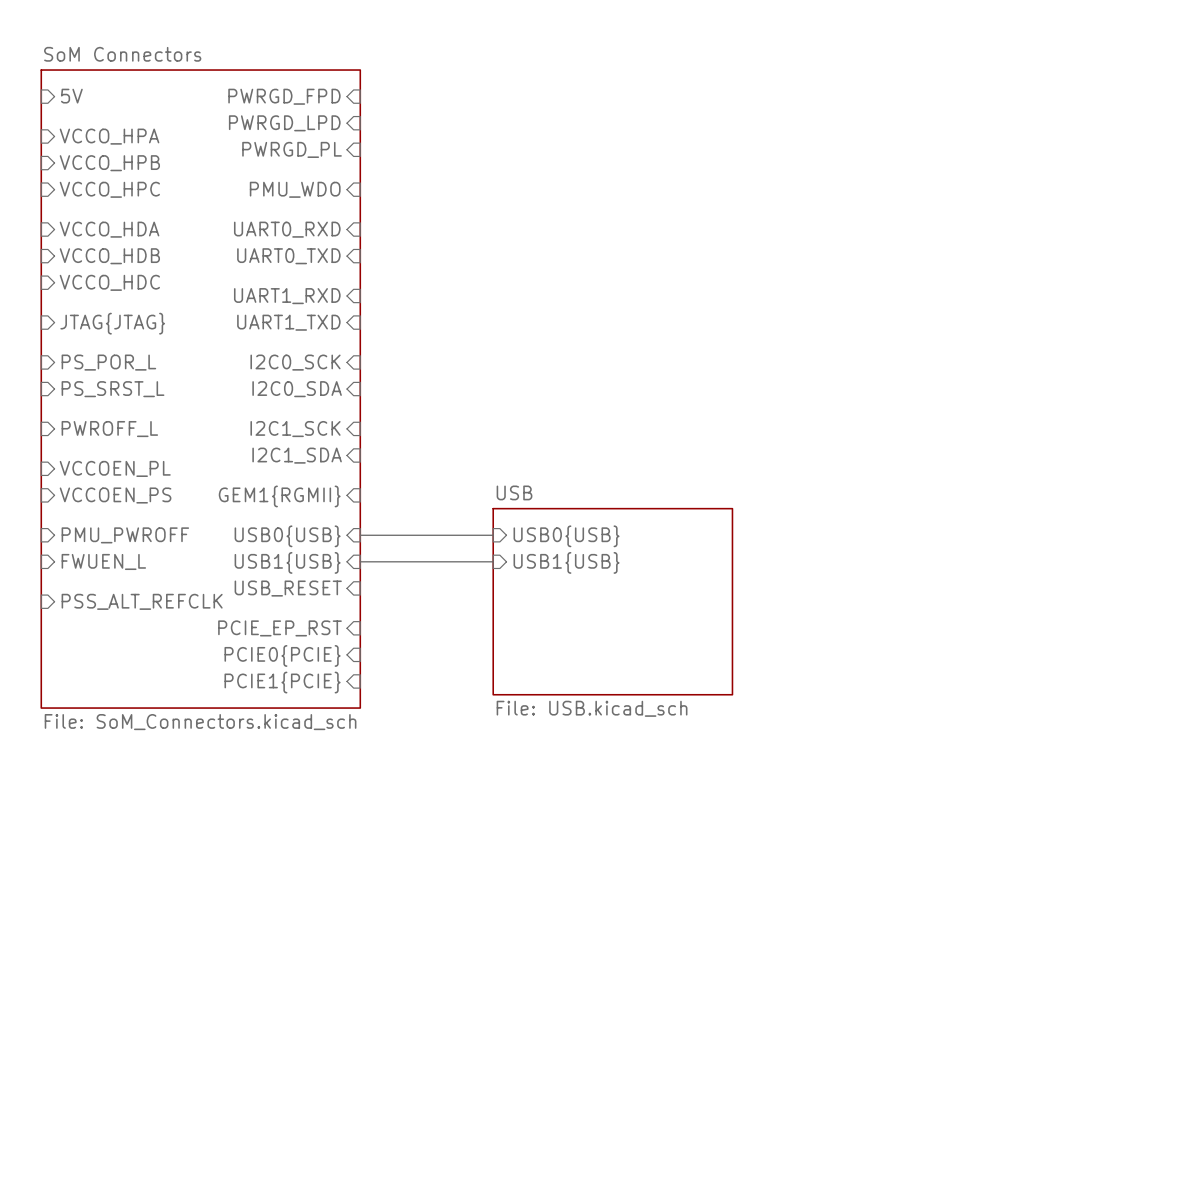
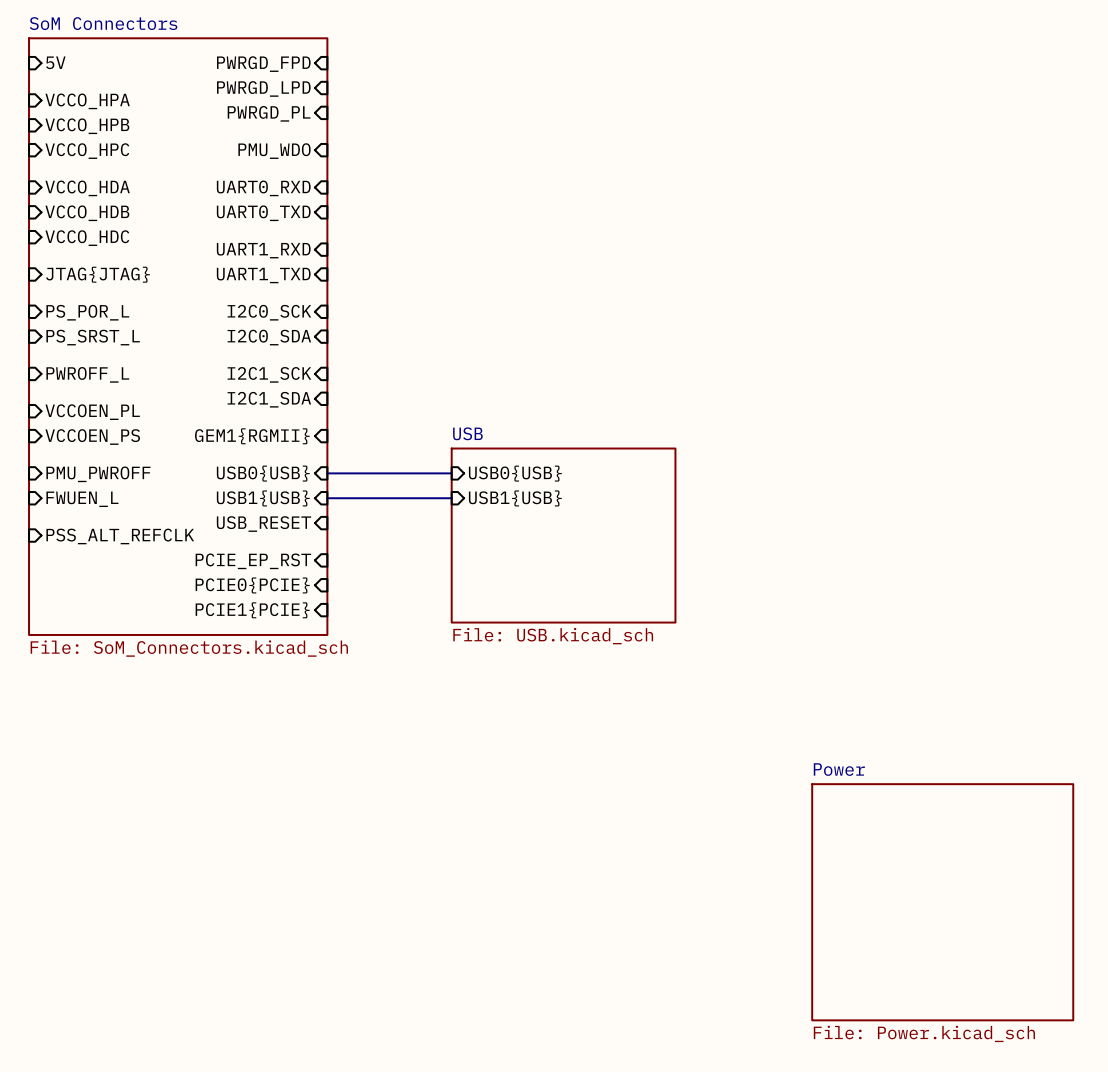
sheet Power: none -> File: Power.kicad_sch (942, 902)

